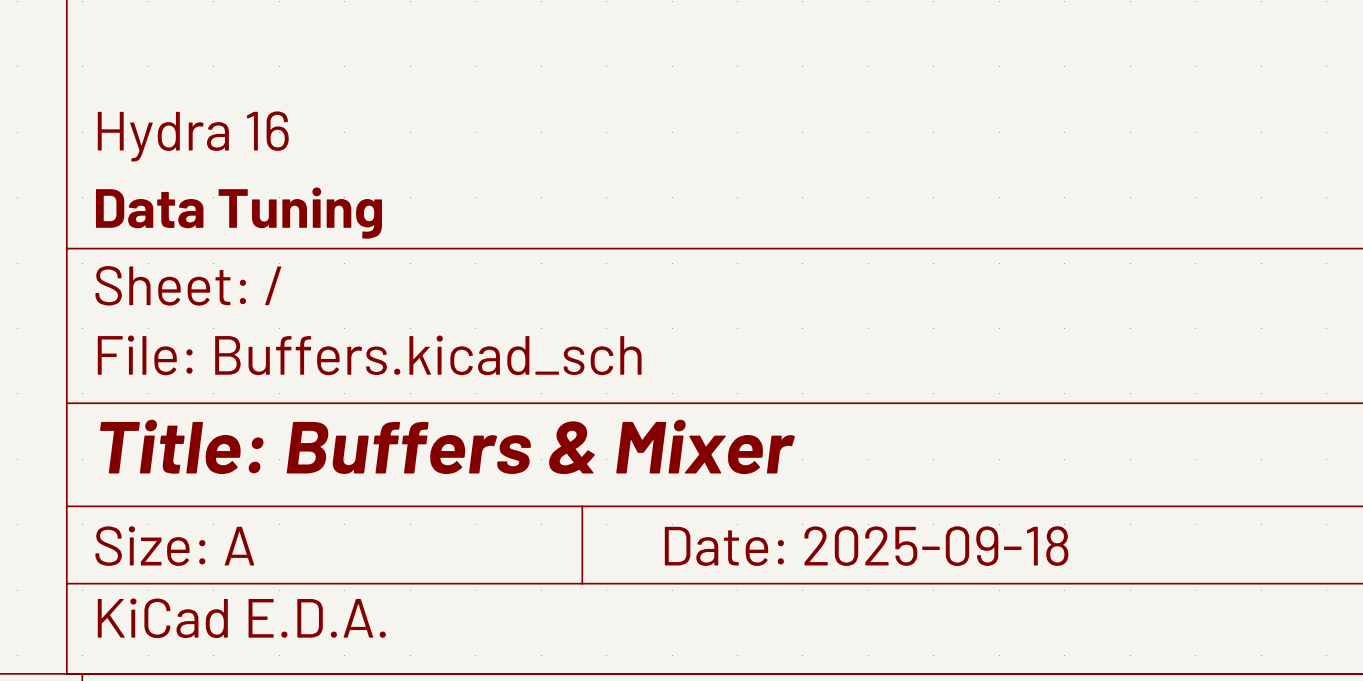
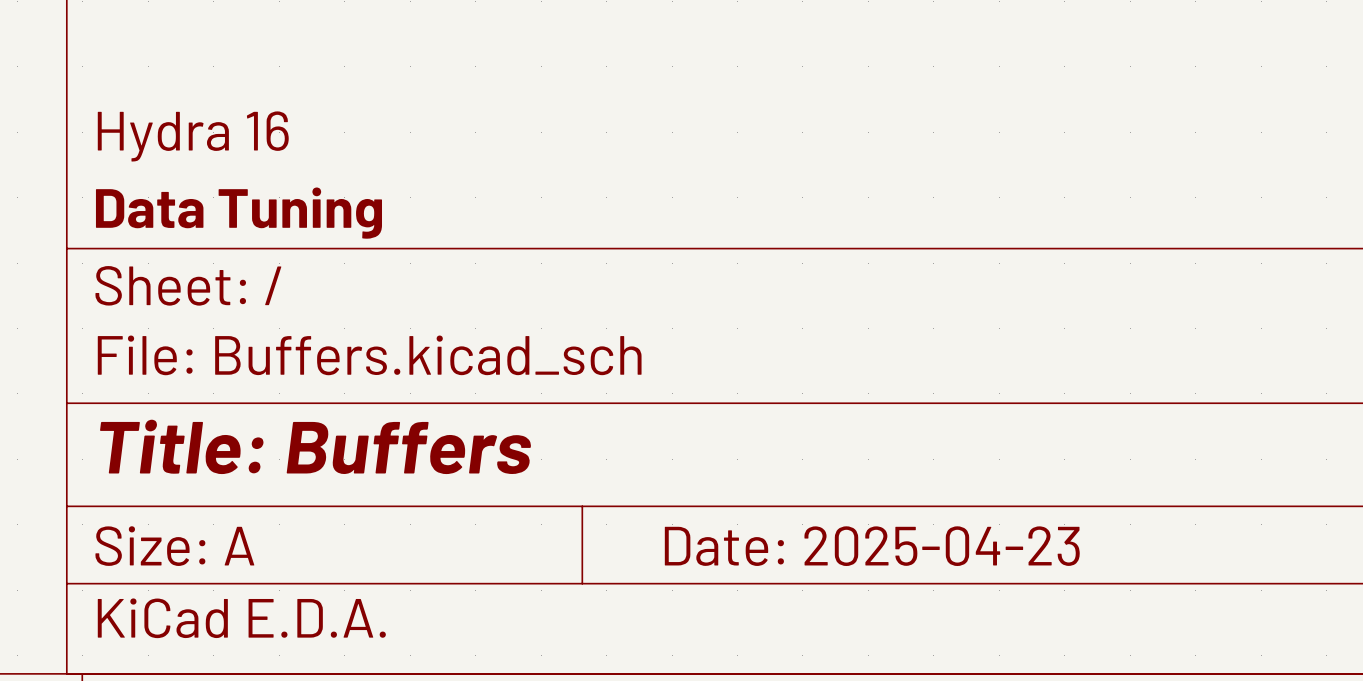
title block: Title: Buffers & Mixer (447, 446) -> Title: Buffers (315, 446)
title block: Date: 2025-09-18 (866, 546) -> Date: 2025-04-23 (872, 546)

